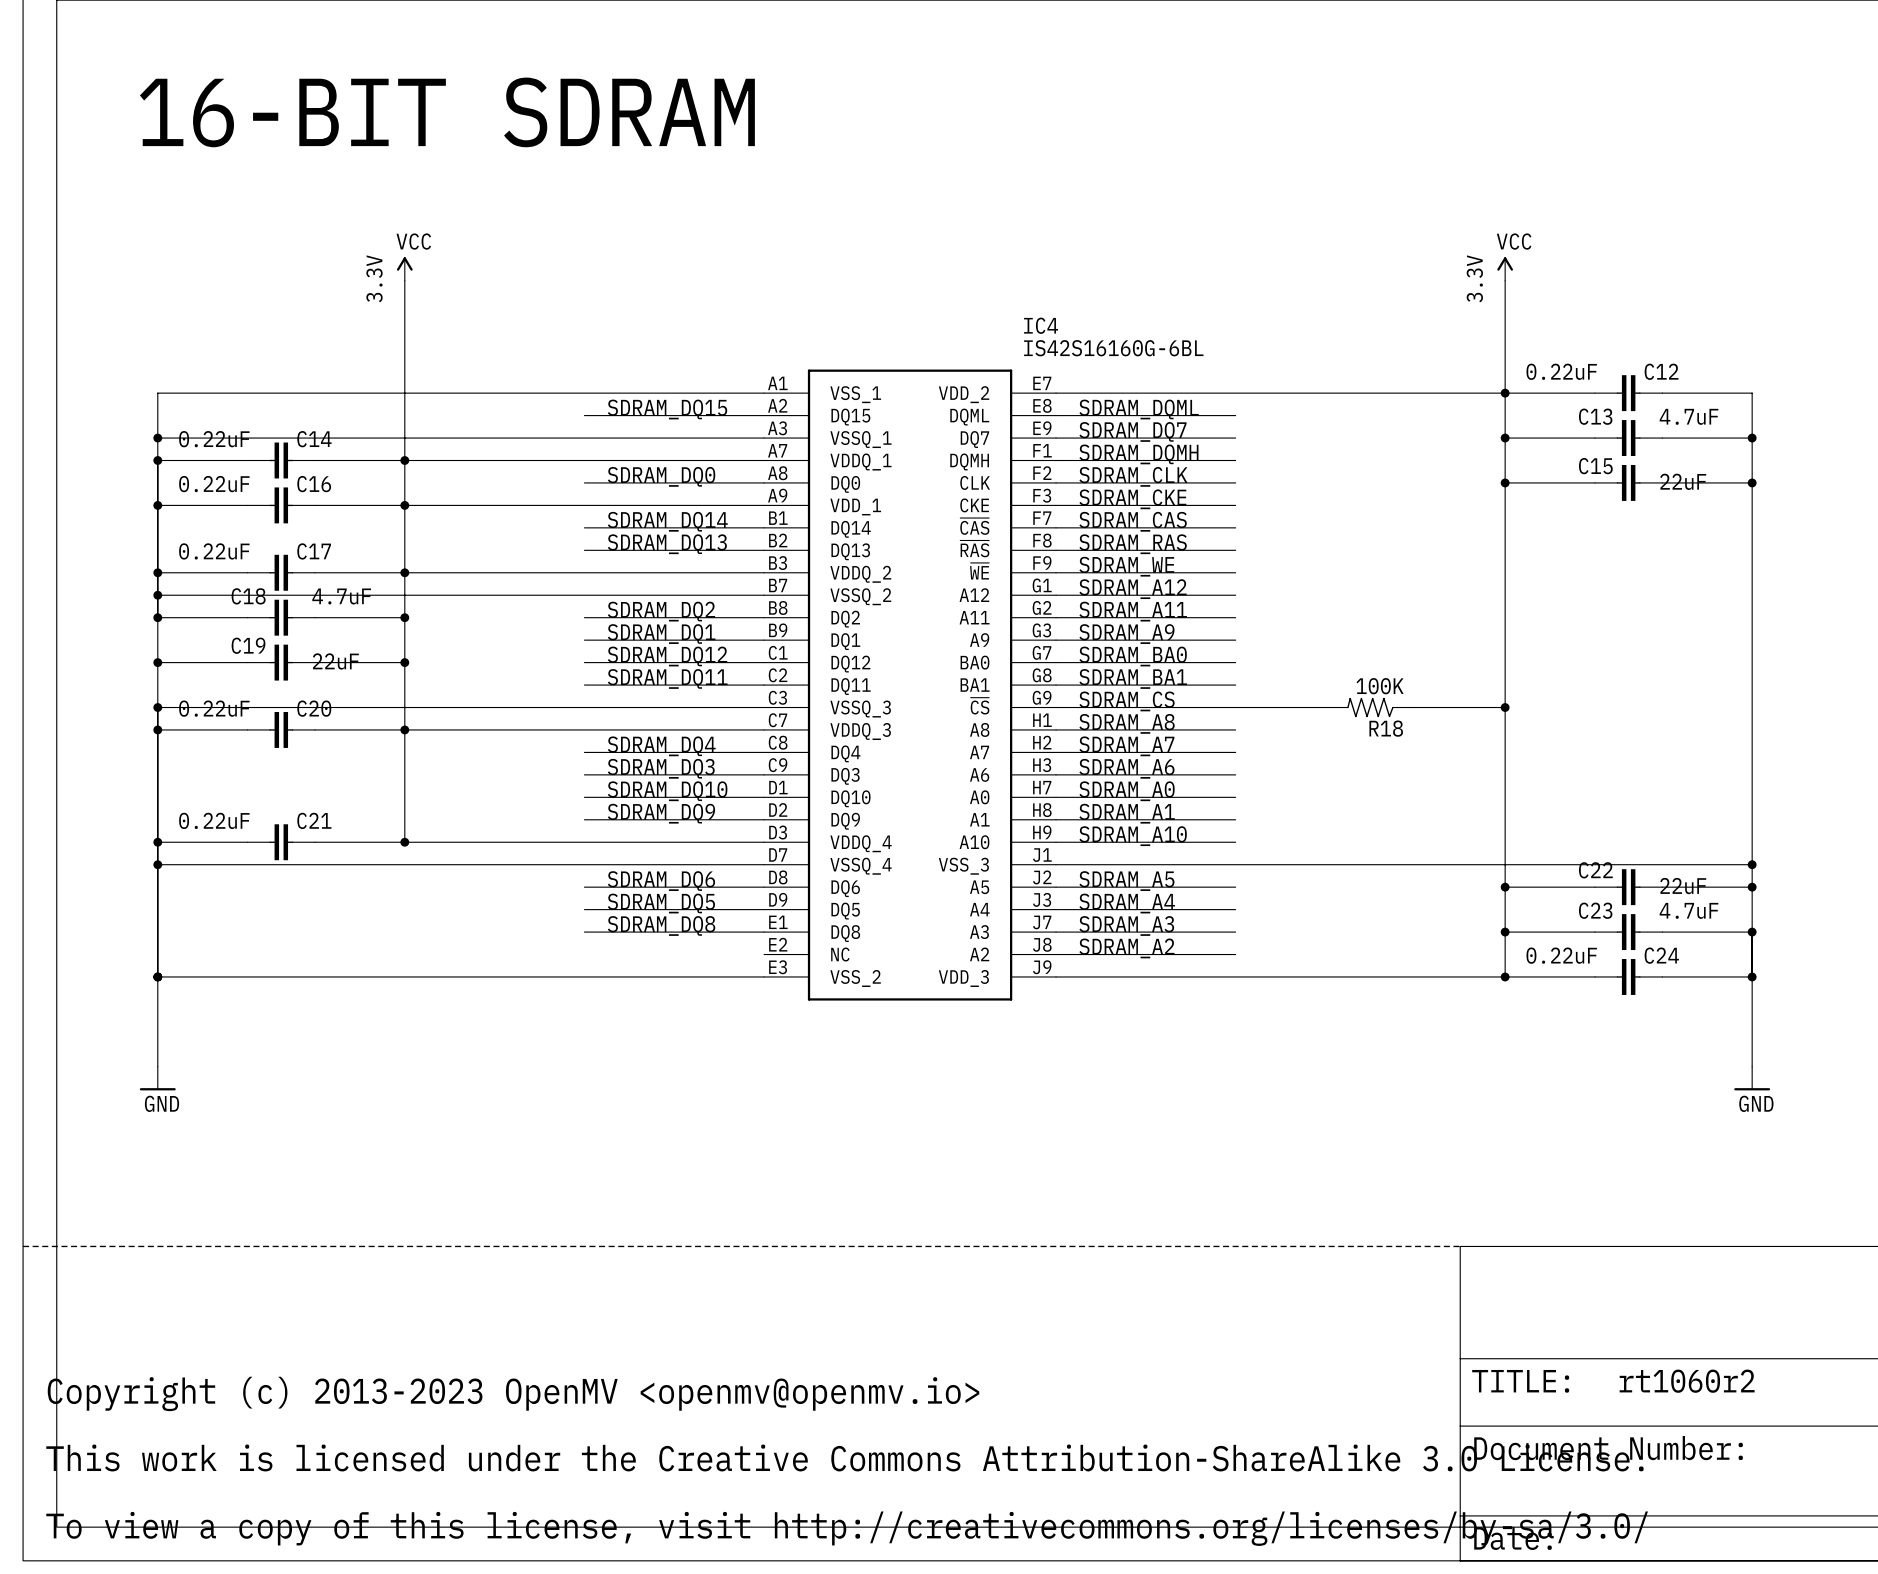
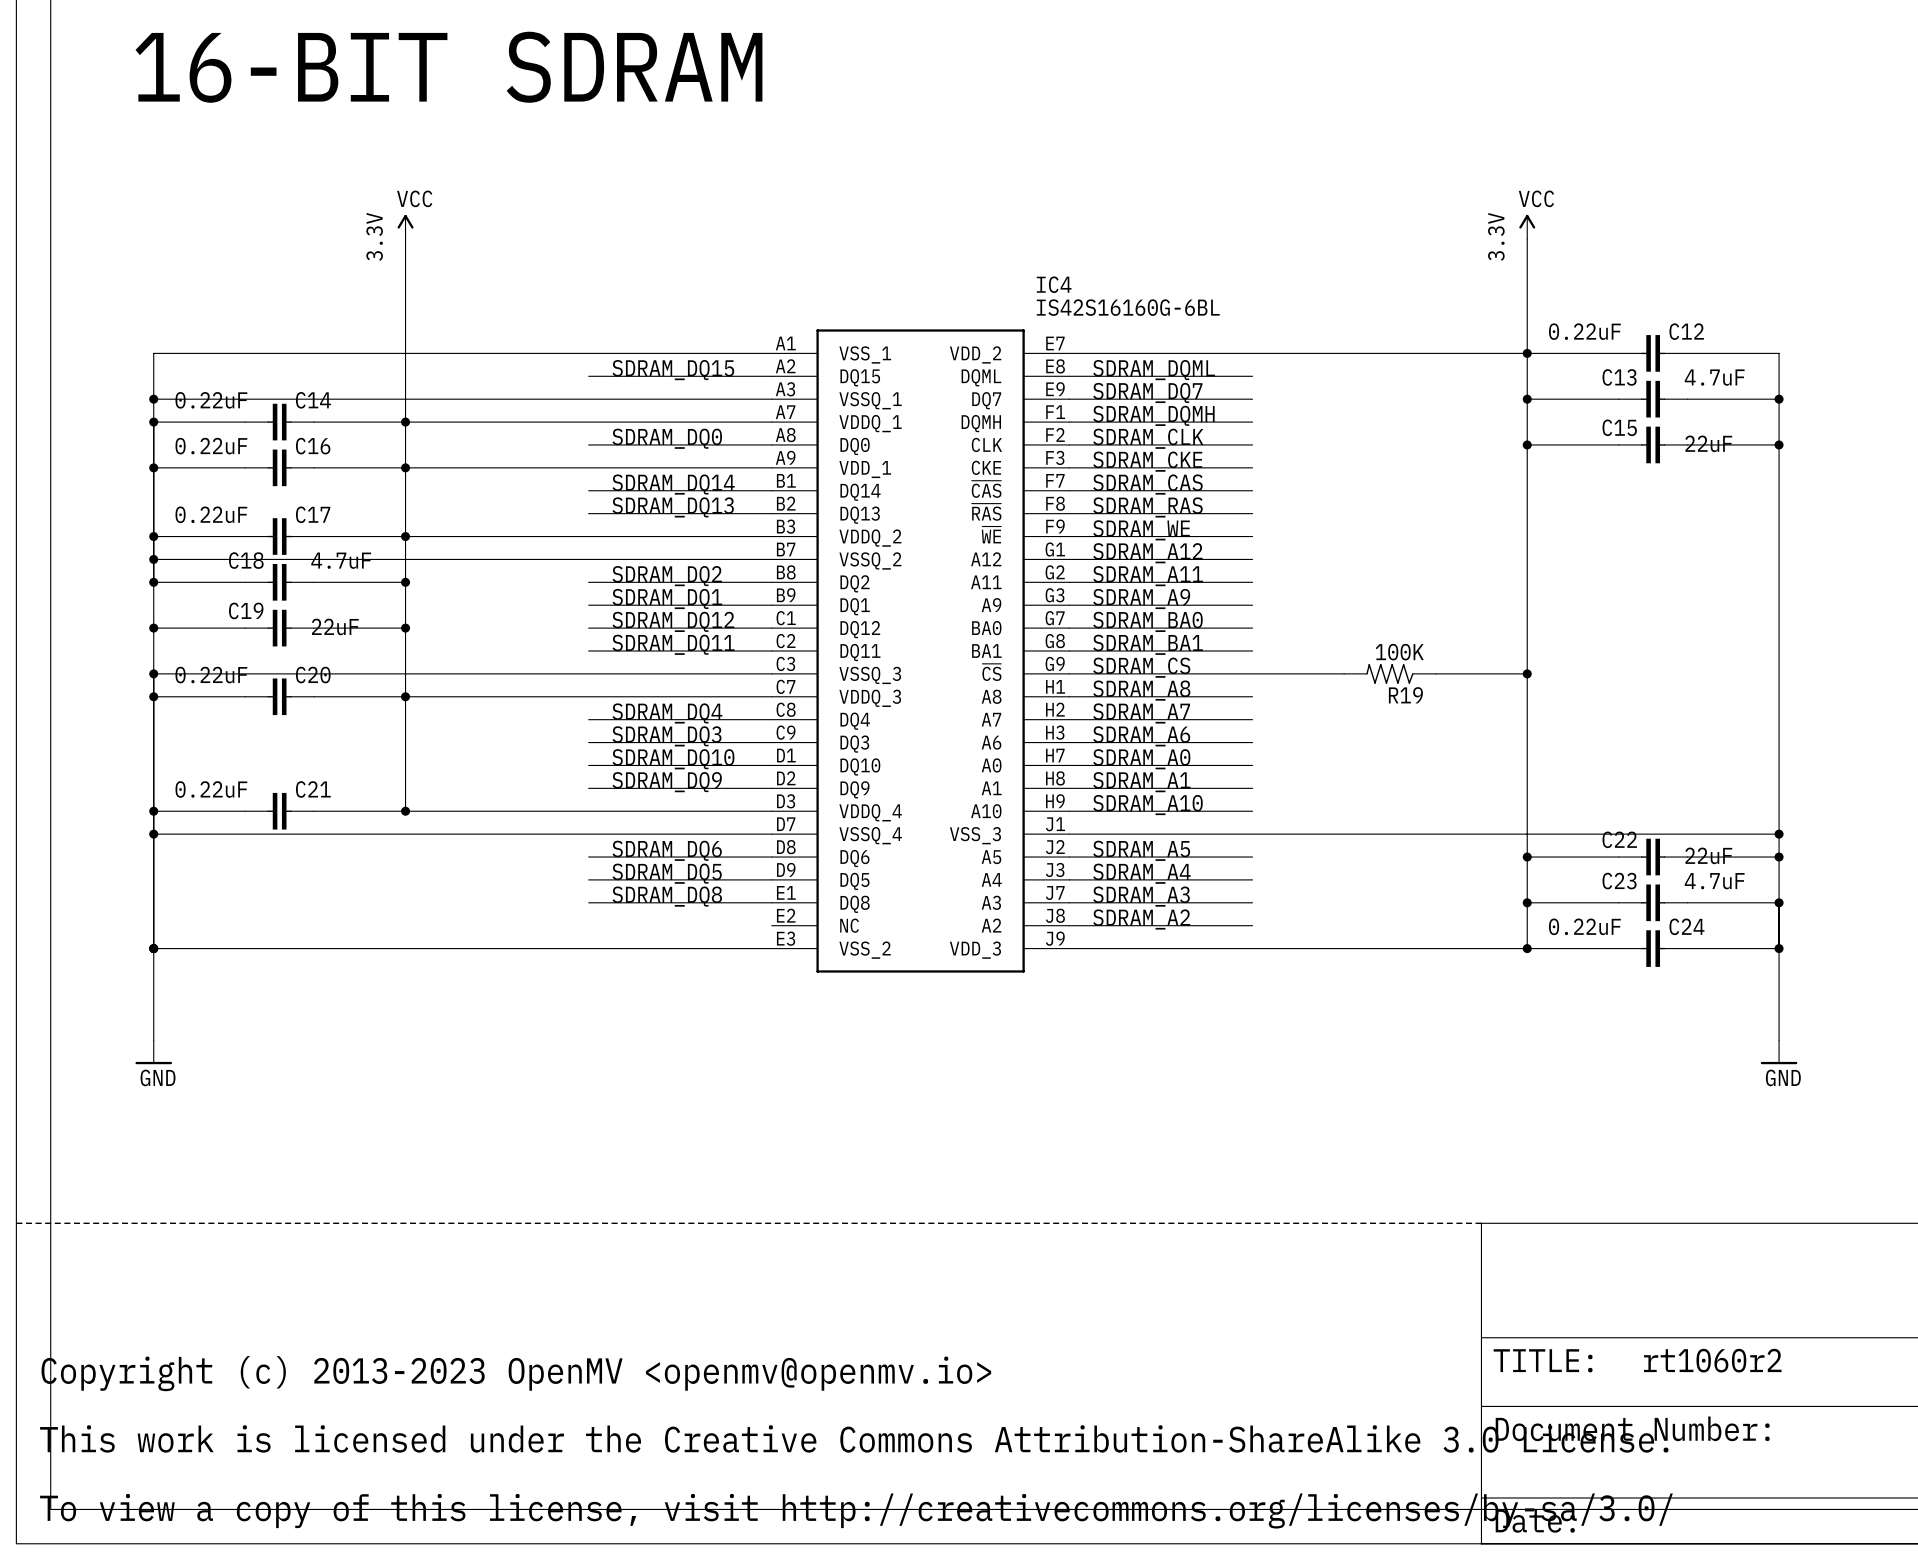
R18 name: R18 (1386, 728) -> R19 (1405, 695)

